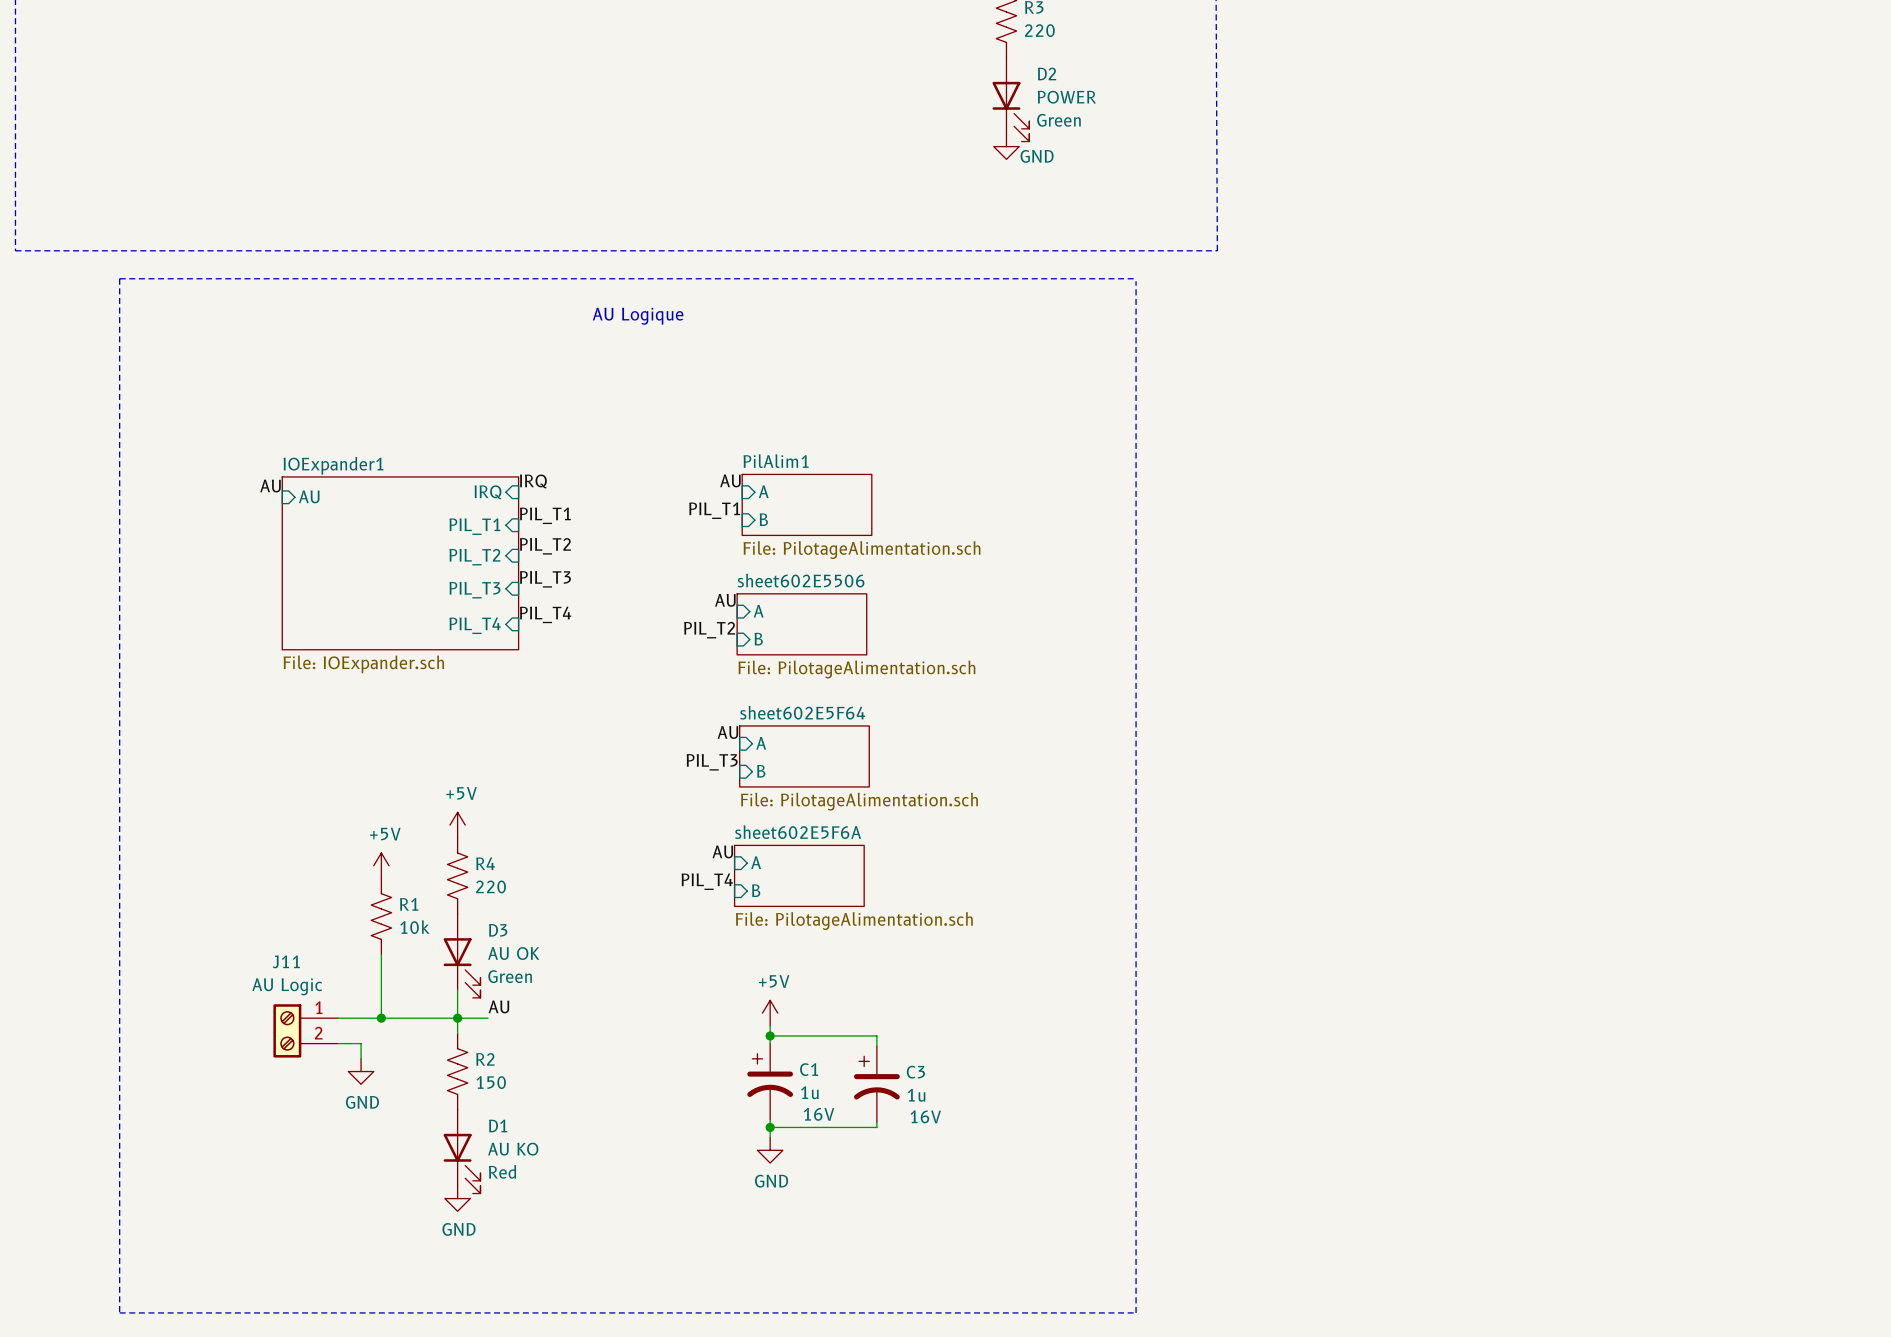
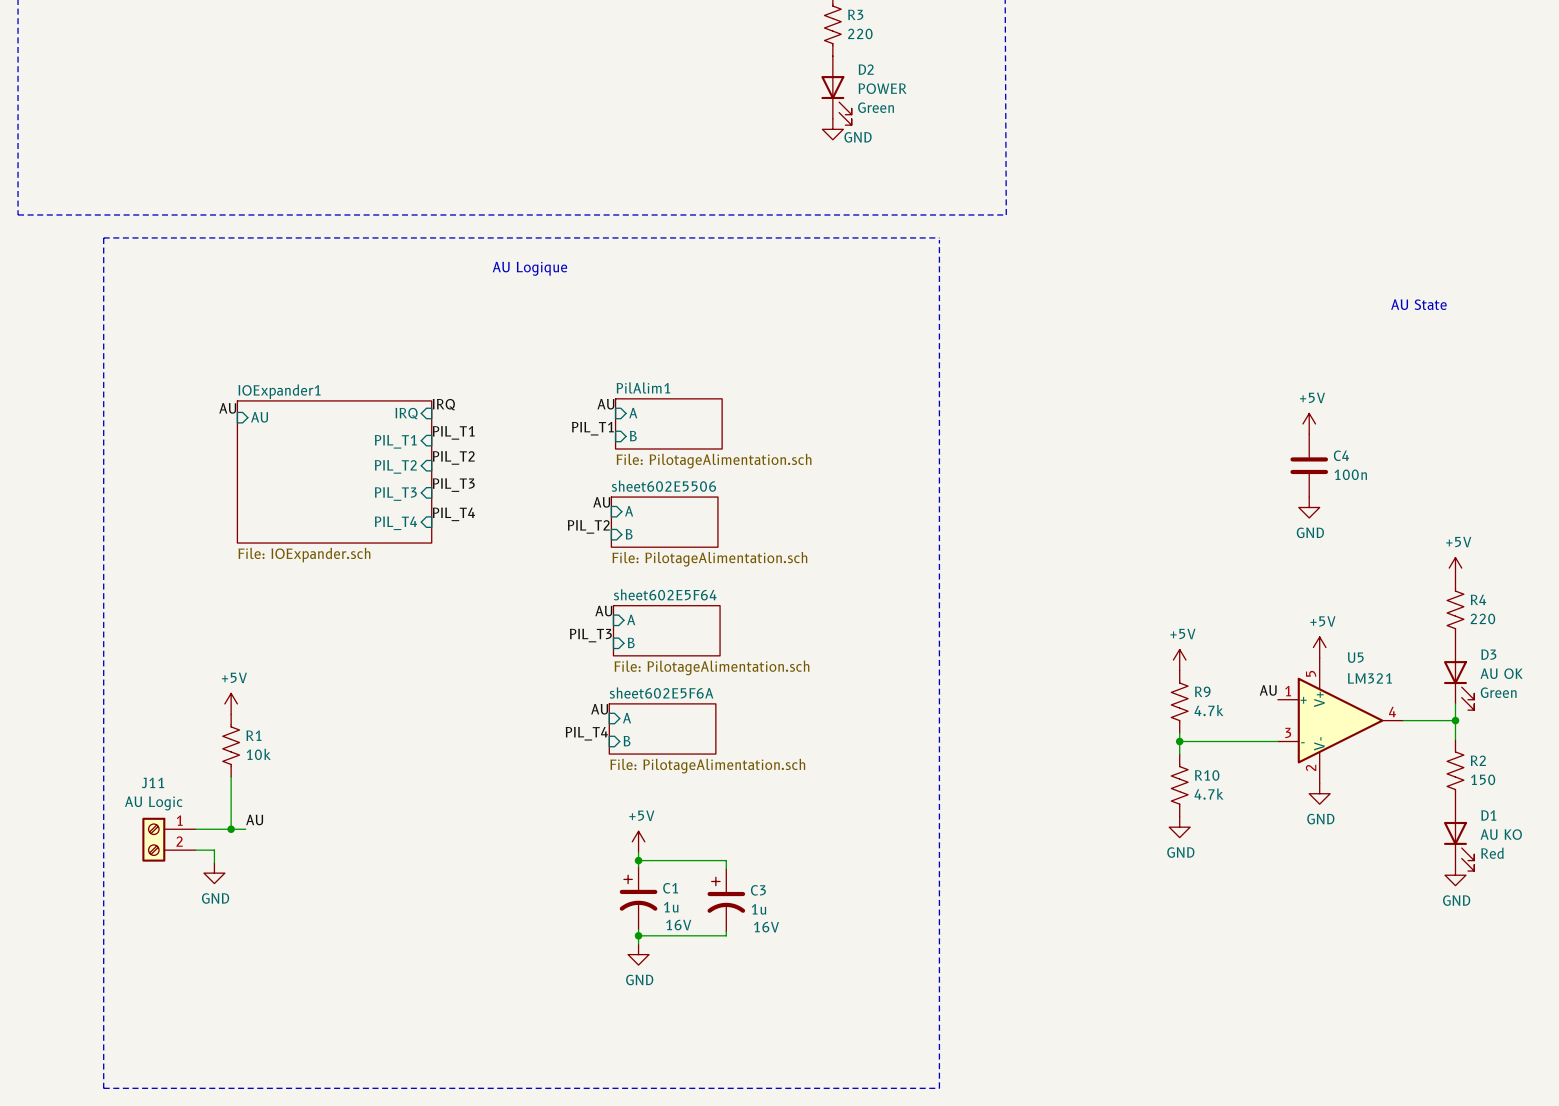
text: none -> AU State (1418, 304)
power symbol: none -> +5V (1309, 423)
C4: none -> 100n (1309, 465)
power symbol: none -> GND (1309, 507)
power symbol: none -> +5V (1455, 568)
power symbol: none -> +5V (1319, 647)
power symbol: none -> +5V (1179, 660)
power symbol: +5V (457, 825) -> none
label: none -> AU (1268, 690)
R9: none -> 4.7k (1179, 701)
power symbol: none -> +5V (231, 703)
wire: none -> (1455, 703) (1455, 739)
power symbol: +5V (381, 865) -> none
U5: none -> LM321 (1340, 720)
wire: none -> (1403, 720) (1455, 720)
junction: none -> (1455, 720)
R4 position: (457, 875) -> (1455, 609)
wire: none -> (1179, 733) (1179, 754)
wire: none -> (1179, 741) (1277, 741)
junction: none -> (1179, 741)
R1 position: (381, 916) -> (231, 745)
R10: none -> 4.7k (1179, 785)
wire: (381, 954) (381, 1018) -> (231, 777) (231, 829)
power symbol: none -> GND (1319, 793)
D3 position: (462, 955) -> (1459, 675)
wire: (457, 990) (457, 1033) -> none
power symbol: none -> GND (1179, 827)
wire: none -> (195, 829) (245, 829)
junction: none -> (231, 829)
label position: AU (498, 1006) -> AU (254, 819)
wire: (338, 1018) (488, 1018) -> none
junction: (381, 1018) -> none
junction: (457, 1018) -> none
J11 position: (305, 1030) -> (168, 839)
wire: (338, 1043) (361, 1043) (361, 1058) -> (195, 850) (214, 850) (214, 862)
power symbol: none -> GND (1455, 875)
power symbol position: GND (361, 1071) -> GND (214, 873)
R2 position: (457, 1071) -> (1455, 770)
D1 position: (462, 1151) -> (1459, 836)
power symbol: GND (457, 1198) -> none

